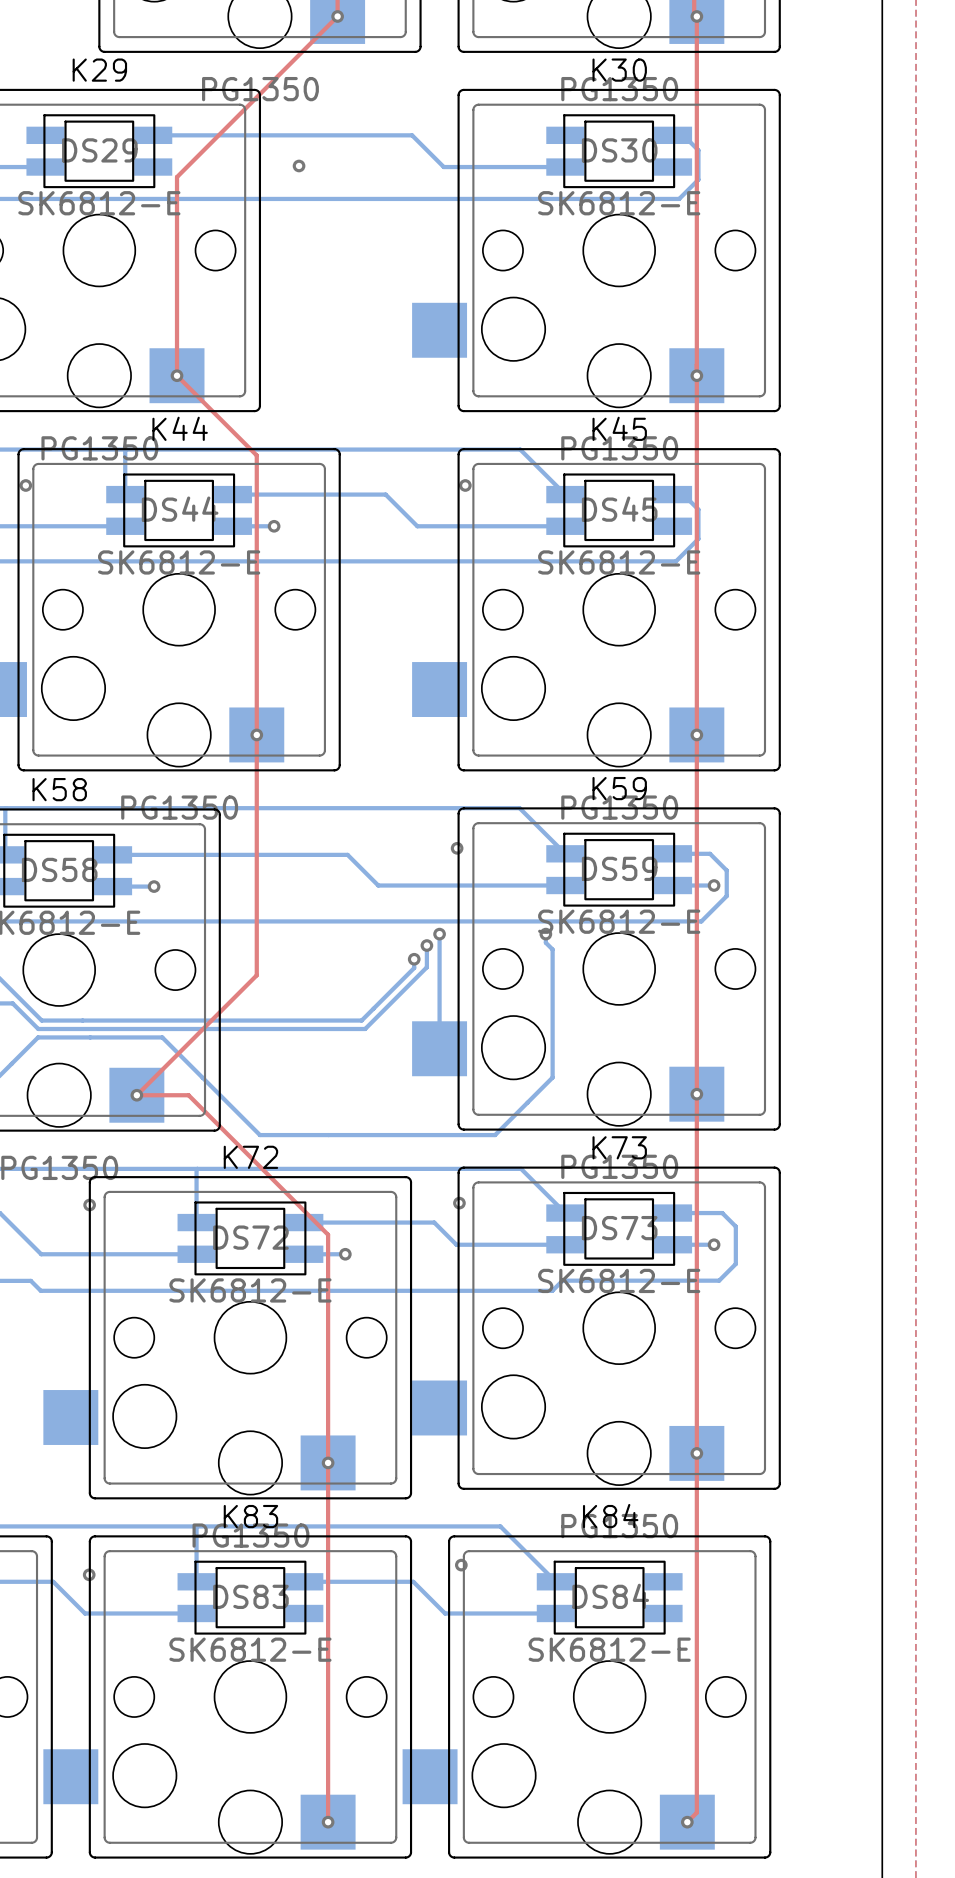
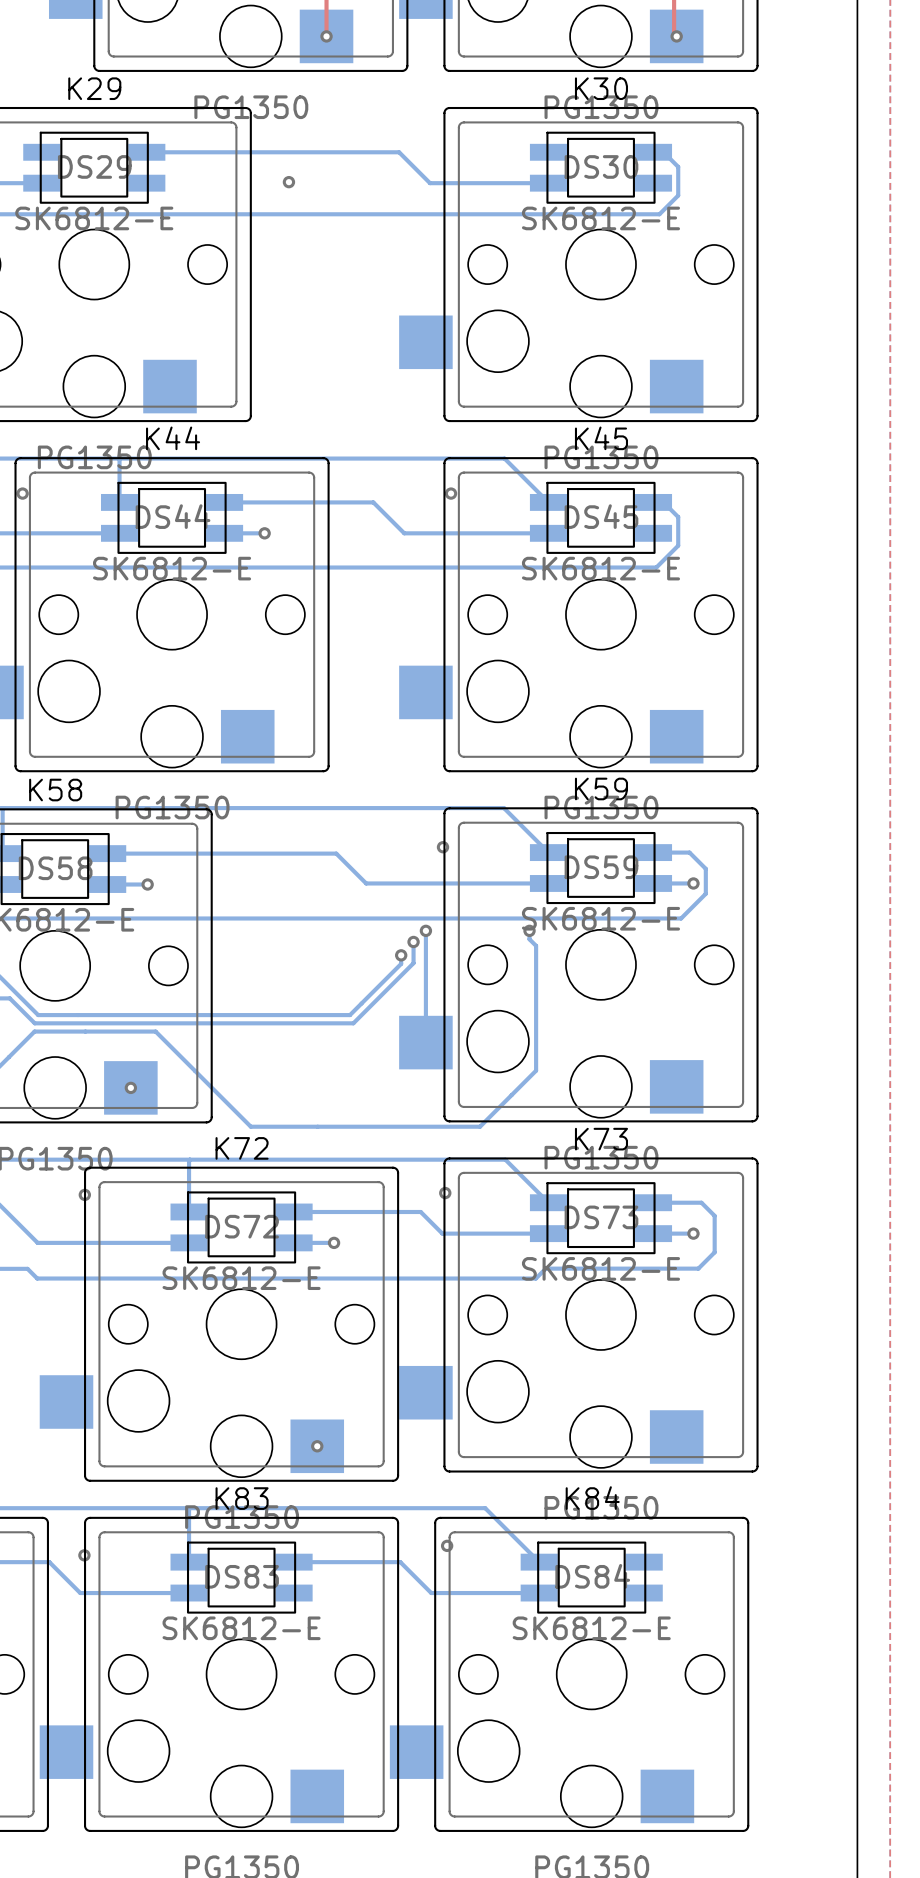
top track: (337, 16) (177, 177) (177, 375) (256, 455) (256, 975) (136, 1095) (188, 1095) (328, 1234) (328, 1822) -> none
top track: (696, 16) (696, 1812) (687, 1822) -> none
via: (177, 375) -> none
via: (696, 375) -> none
via: (256, 734) -> none
via: (696, 734) -> none
via: (696, 1094) -> none
via: (696, 1453) -> none
via: (328, 1822) -> none
via: (687, 1822) -> none

